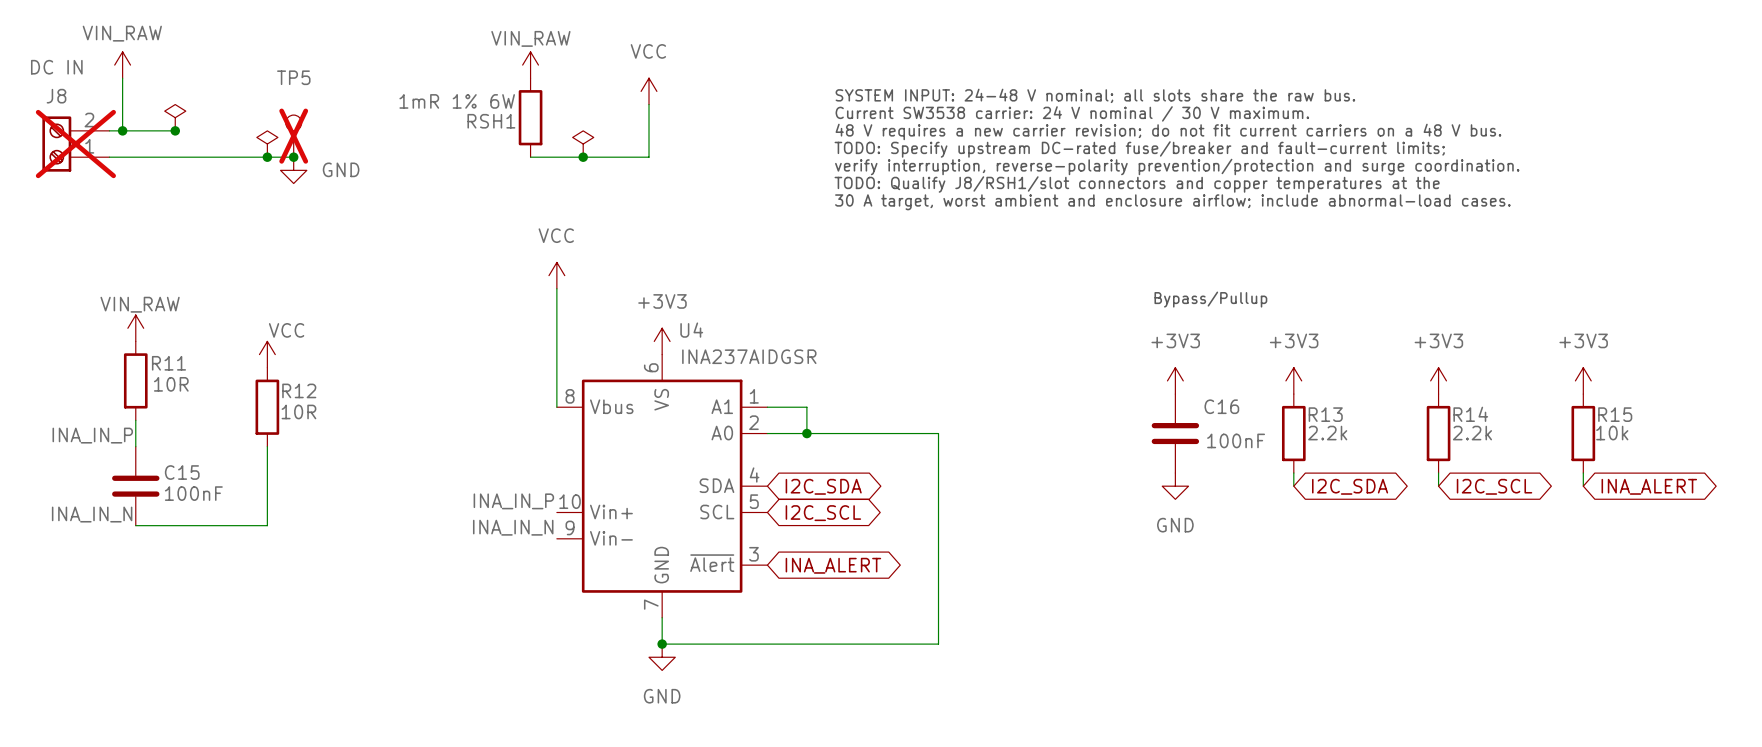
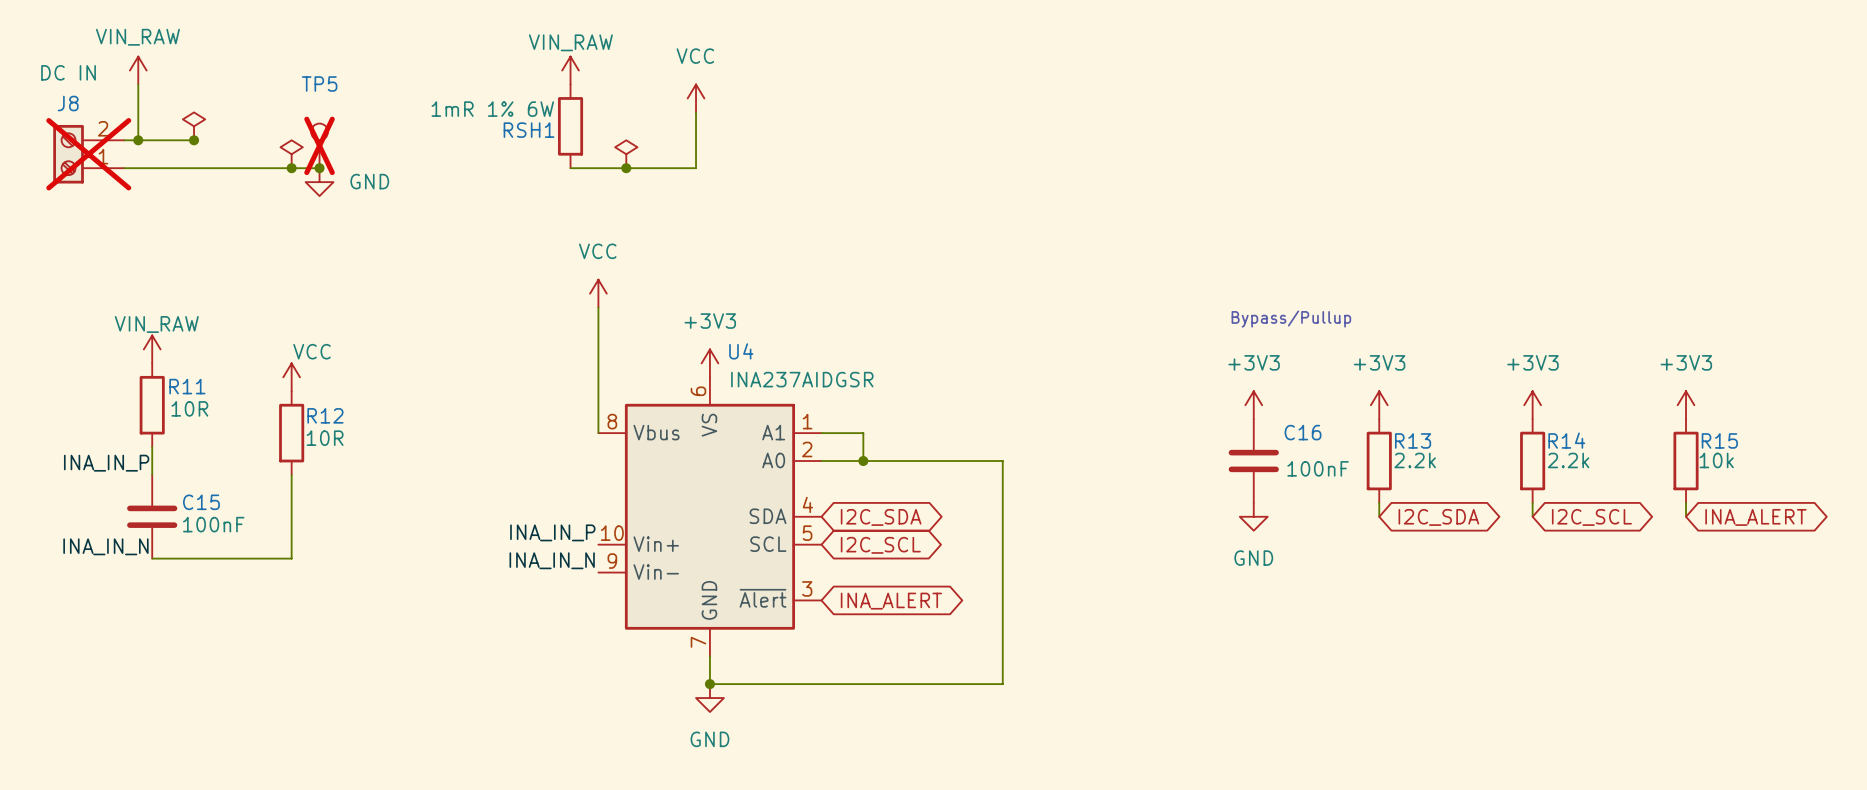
text: SYSTEM INPUT: 24-48 V nominal; all slots share the raw bus. (1095, 95) -> none
text: Current SW3538 carrier: 24 V nominal / 30 V maximum. (1072, 113) -> none
text: 48 V requires a new carrier revision; do not fit current carriers on a 48 V bus. (1168, 131) -> none
text: TODO: Specify upstream DC-rated fuse/breaker and fault-current limits; (1139, 149) -> none
text: verify interruption, reverse-polarity prevention/protection and surge coordination. (1177, 166) -> none
text: TODO: Qualify J8/RSH1/slot connectors and copper temperatures at the (1137, 184) -> none
text: 30 A target, worst ambient and enclosure airflow; include abnormal-load cases. (1172, 202) -> none

